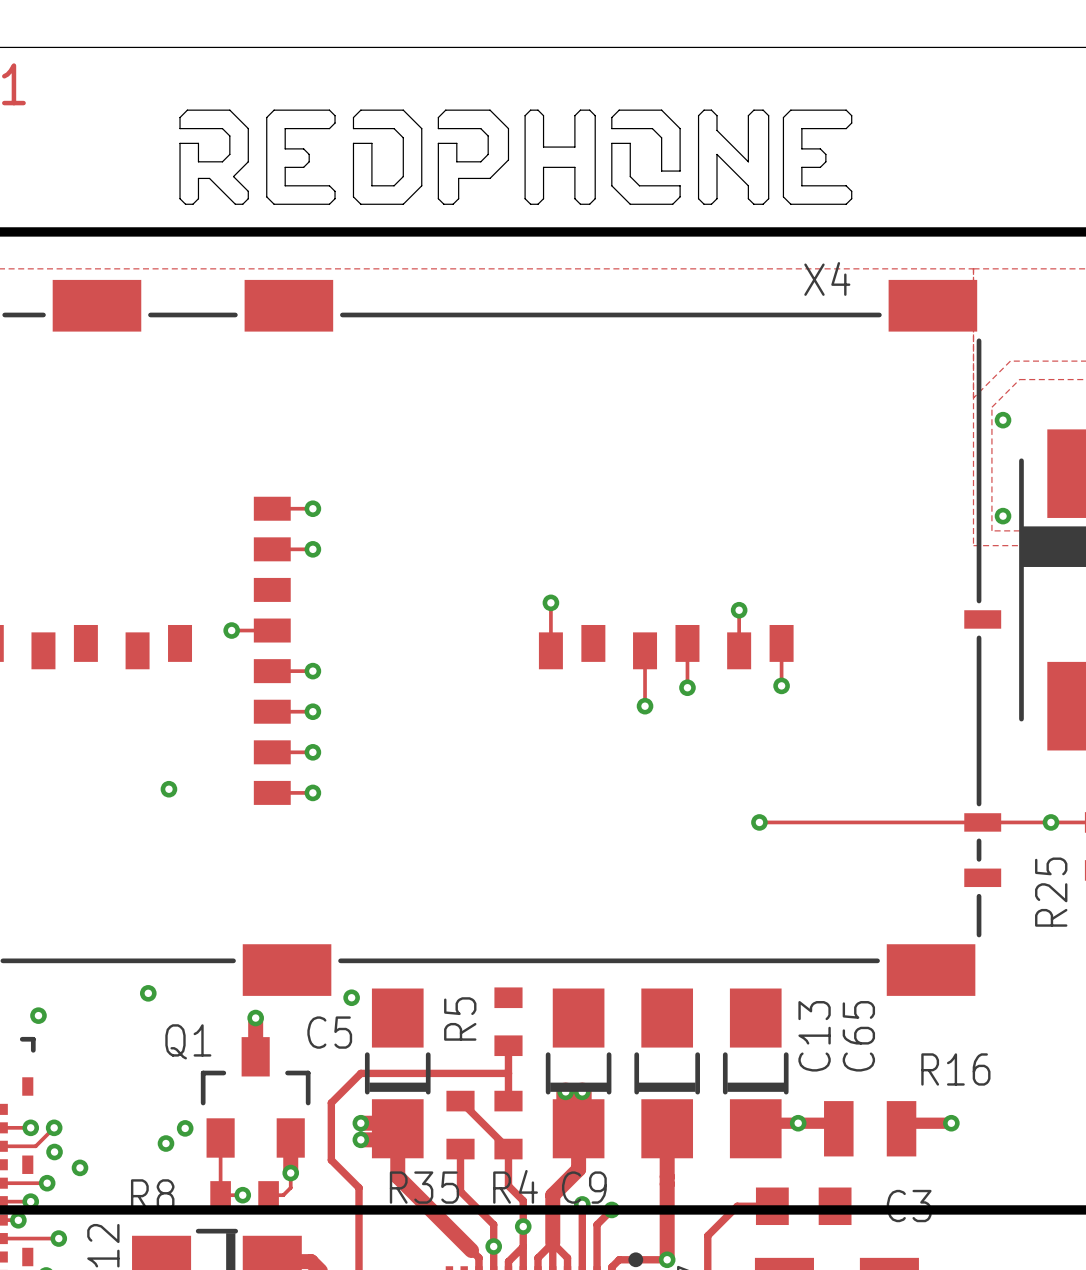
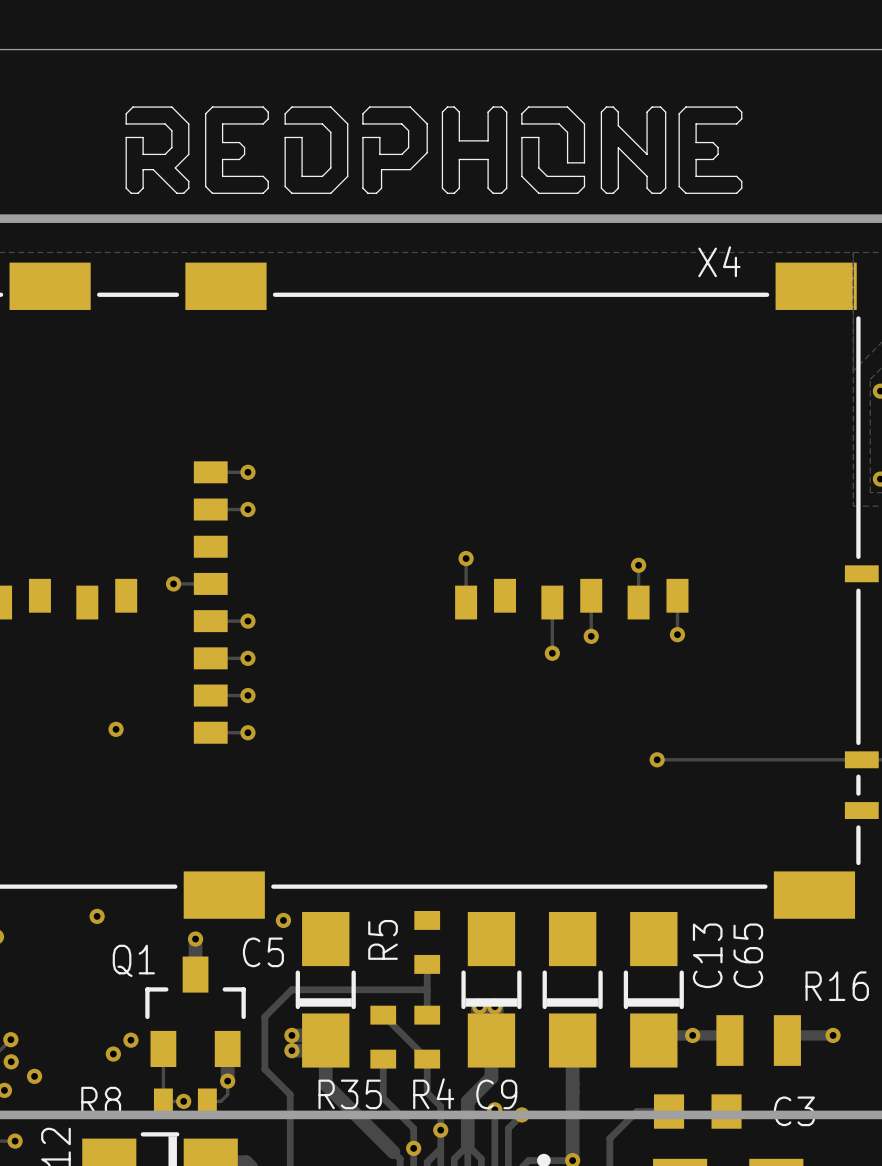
drawing: none -> [126, 107, 742, 194]
board edge: (187, 110) (180, 117) (180, 128) (222, 128) (229, 135) (229, 154) (222, 161) (198, 161) (198, 143) (180, 143) (180, 198) (185, 204) (192, 204) (198, 198) (198, 178) (209, 178) (235, 204) (242, 204) (248, 198) (248, 191) (233, 176) (248, 161) (248, 128) (229, 110) (187, 110) -> none
board edge: (274, 110) (329, 110) (335, 115) (335, 123) (329, 128) (285, 128) (285, 148) (303, 148) (309, 154) (309, 161) (303, 167) (285, 167) (285, 185) (329, 185) (335, 191) (335, 198) (329, 204) (274, 204) (266, 196) (266, 117) (274, 110) -> none
board edge: (360, 110) (403, 110) (421, 128) (421, 185) (403, 204) (360, 204) (353, 196) (353, 143) (371, 143) (371, 185) (394, 185) (403, 176) (403, 137) (394, 128) (353, 128) (353, 117) (360, 110) -> none
board edge: (445, 110) (490, 110) (508, 128) (508, 159) (490, 178) (458, 178) (458, 198) (453, 204) (443, 204) (438, 198) (438, 143) (456, 143) (456, 161) (480, 161) (488, 154) (488, 135) (480, 128) (438, 128) (438, 117) (445, 110) -> none
board edge: (530, 110) (538, 110) (543, 115) (543, 147) (574, 147) (574, 115) (580, 110) (589, 110) (595, 115) (595, 198) (589, 204) (580, 204) (574, 198) (574, 167) (543, 167) (543, 198) (538, 204) (530, 204) (525, 198) (525, 115) (530, 110) -> none
board edge: (619, 110) (661, 110) (680, 128) (680, 171) (661, 171) (661, 137) (652, 128) (611, 128) (611, 117) (619, 110) -> none
board edge: (704, 110) (711, 110) (717, 115) (717, 130) (748, 161) (748, 115) (753, 110) (763, 110) (768, 115) (768, 198) (763, 204) (753, 204) (748, 198) (748, 185) (717, 154) (717, 198) (711, 204) (704, 204) (698, 198) (698, 115) (704, 110) -> none
board edge: (790, 110) (846, 110) (851, 115) (851, 123) (846, 128) (801, 128) (801, 148) (820, 148) (825, 154) (825, 161) (820, 167) (801, 167) (801, 185) (846, 185) (851, 191) (851, 198) (846, 204) (790, 204) (783, 196) (783, 117) (790, 110) -> none
board edge: (611, 143) (630, 143) (630, 176) (639, 185) (680, 185) (680, 196) (672, 204) (630, 204) (611, 185) (611, 143) -> none

